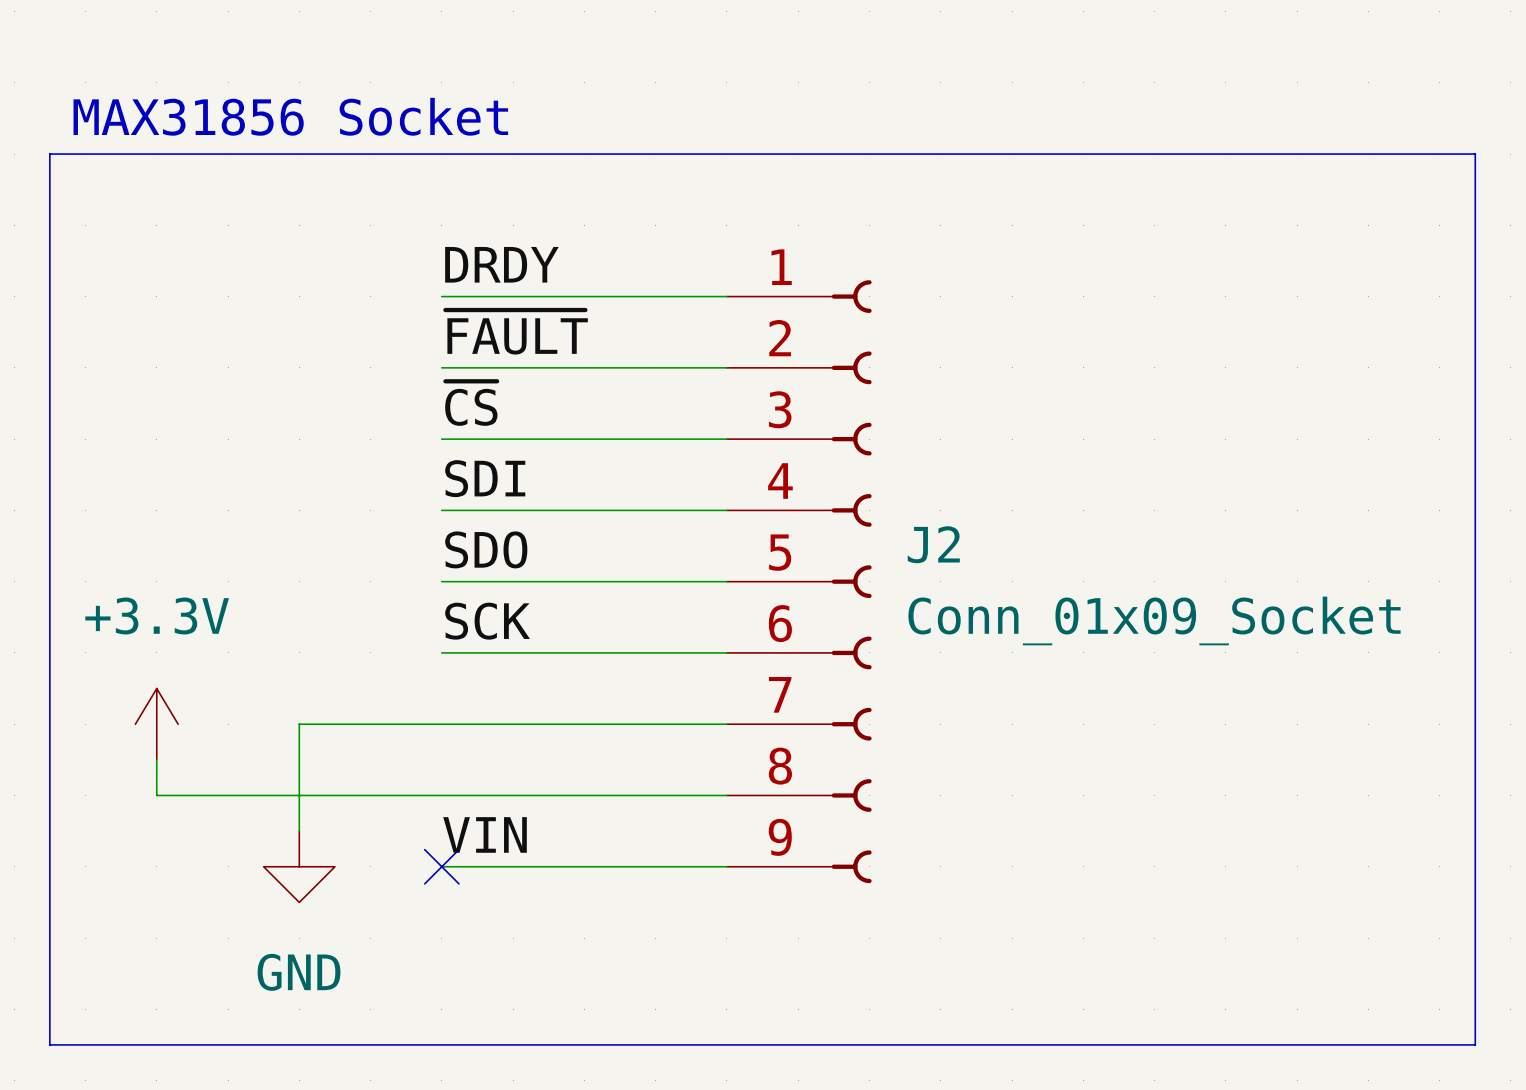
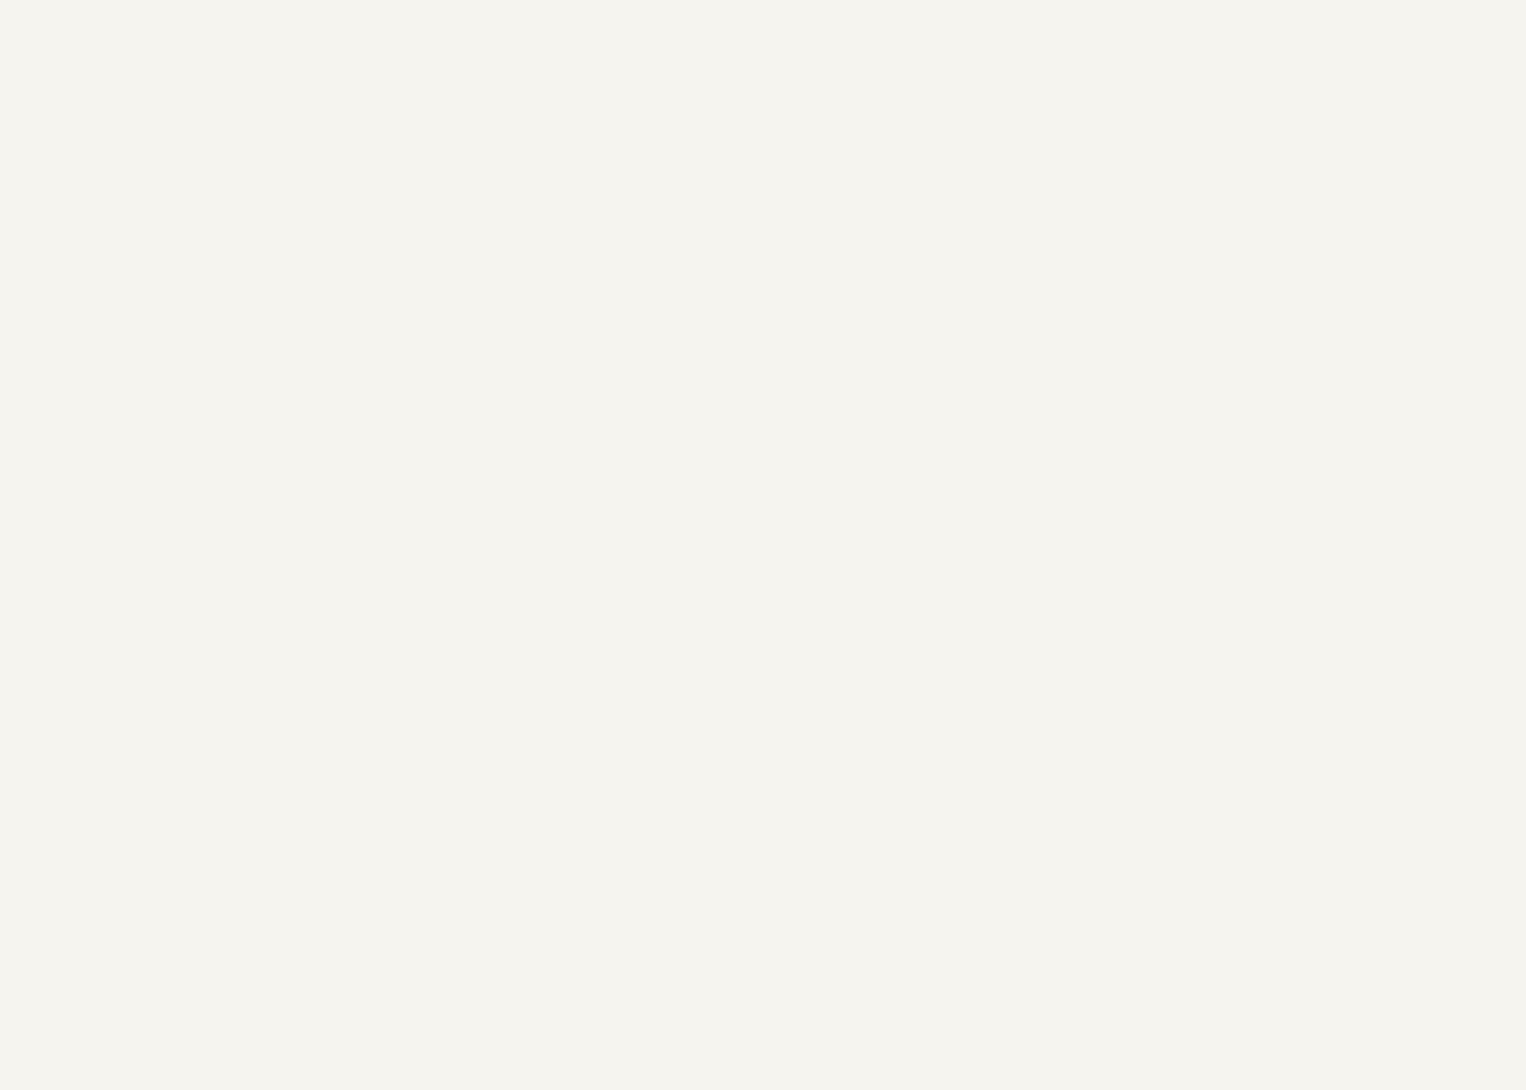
text: MAX31856 Socket (290, 116) -> none
line: (49, 154) (1475, 154) (1475, 1044) (49, 1044) (49, 154) -> none
label: DRDY (501, 264) -> none
wire: (441, 296) (726, 296) -> none
label: ~{FAULT} (516, 332) -> none
wire: (441, 367) (726, 367) -> none
label: ~{CS} (471, 403) -> none
wire: (441, 439) (726, 439) -> none
label: SDI (485, 478) -> none
wire: (441, 510) (726, 510) -> none
label: SDO (486, 549) -> none
wire: (441, 581) (726, 581) -> none
J2: Conn_01x09_Socket (799, 581) -> none
label: SCK (487, 621) -> none
wire: (441, 652) (726, 652) -> none
power symbol: +3.3V (156, 724) -> none
wire: (726, 724) (299, 724) (299, 831) -> none
wire: (156, 759) (156, 795) (726, 795) -> none
label: VIN (485, 834) -> none
power symbol: GND (299, 866) -> none
wire: (441, 866) (726, 866) -> none
no-connect mark: (441, 866) -> none

